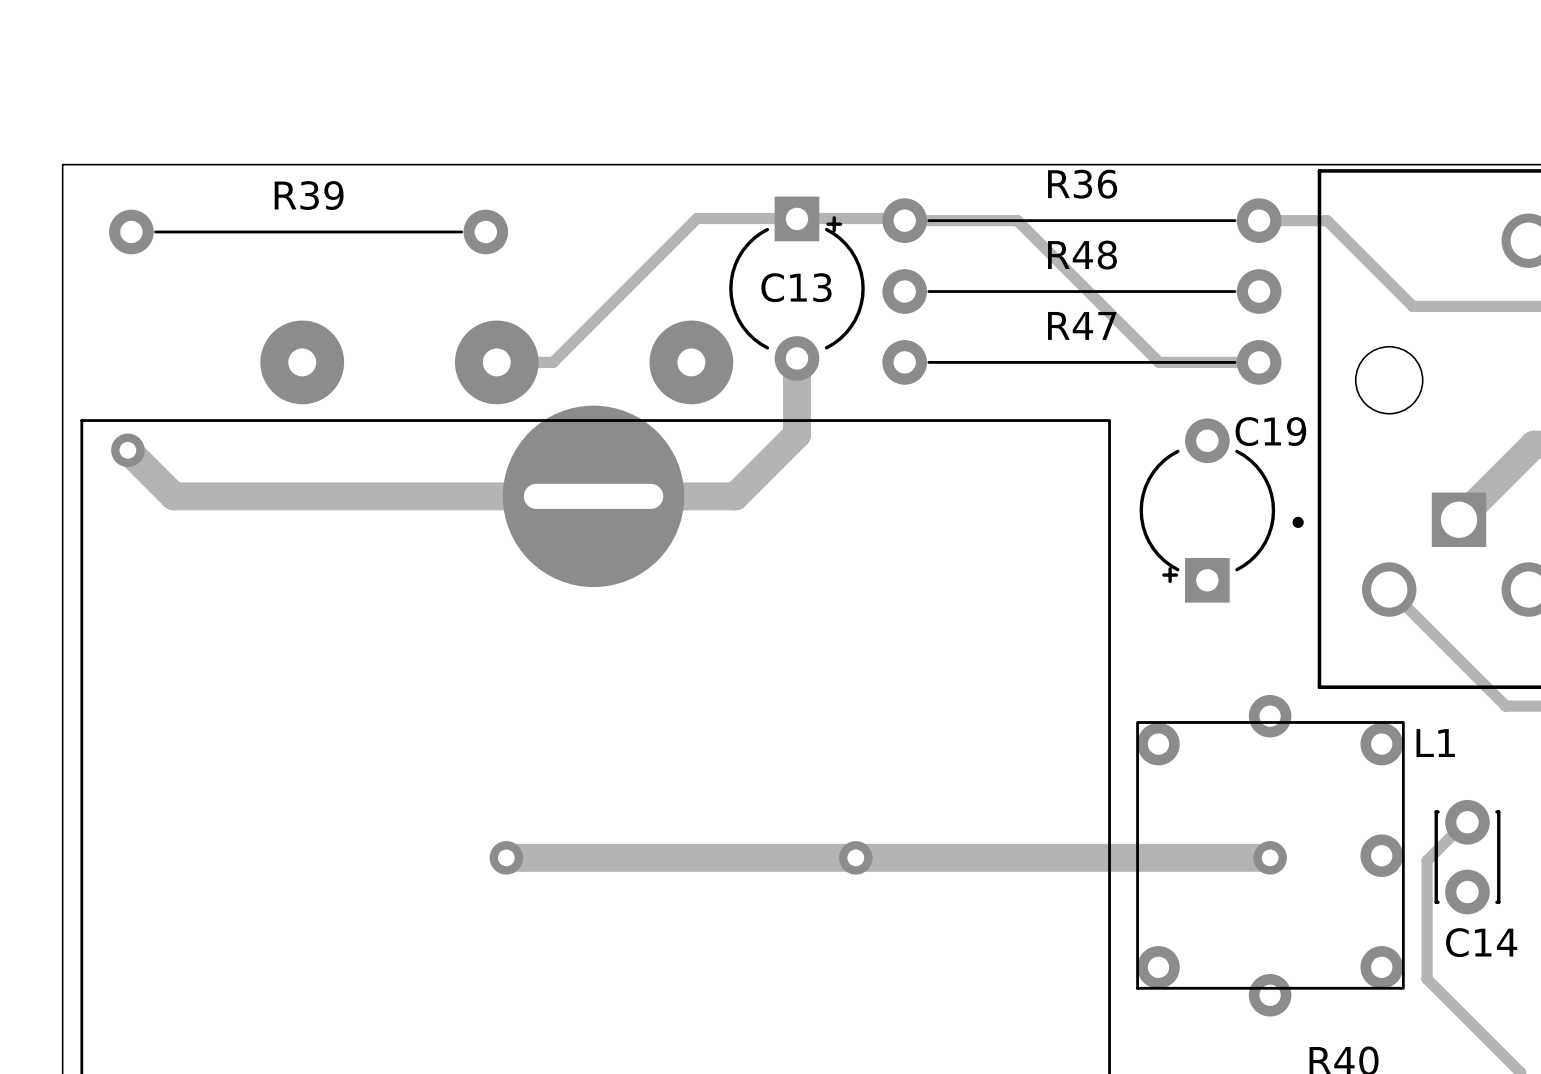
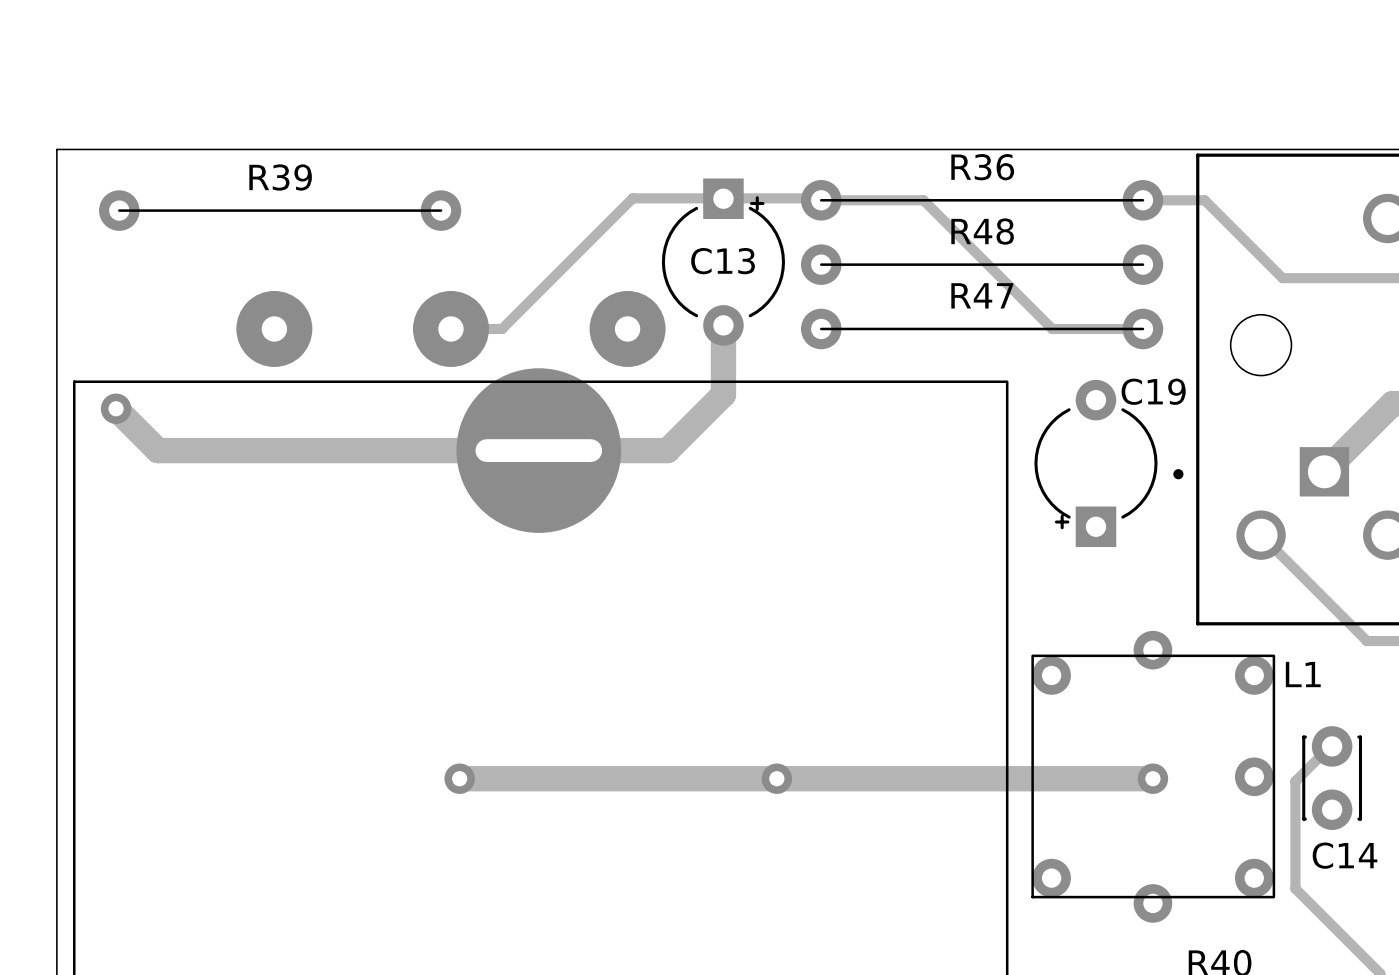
R36 footprint: [882, 198, 1282, 243] -> [800, 180, 1164, 221]
R39 footprint: [109, 209, 509, 255] -> [99, 190, 462, 231]
R48 footprint: [882, 269, 1282, 314] -> [800, 244, 1164, 285]
R47 footprint: [882, 340, 1282, 385] -> [800, 308, 1164, 350]

